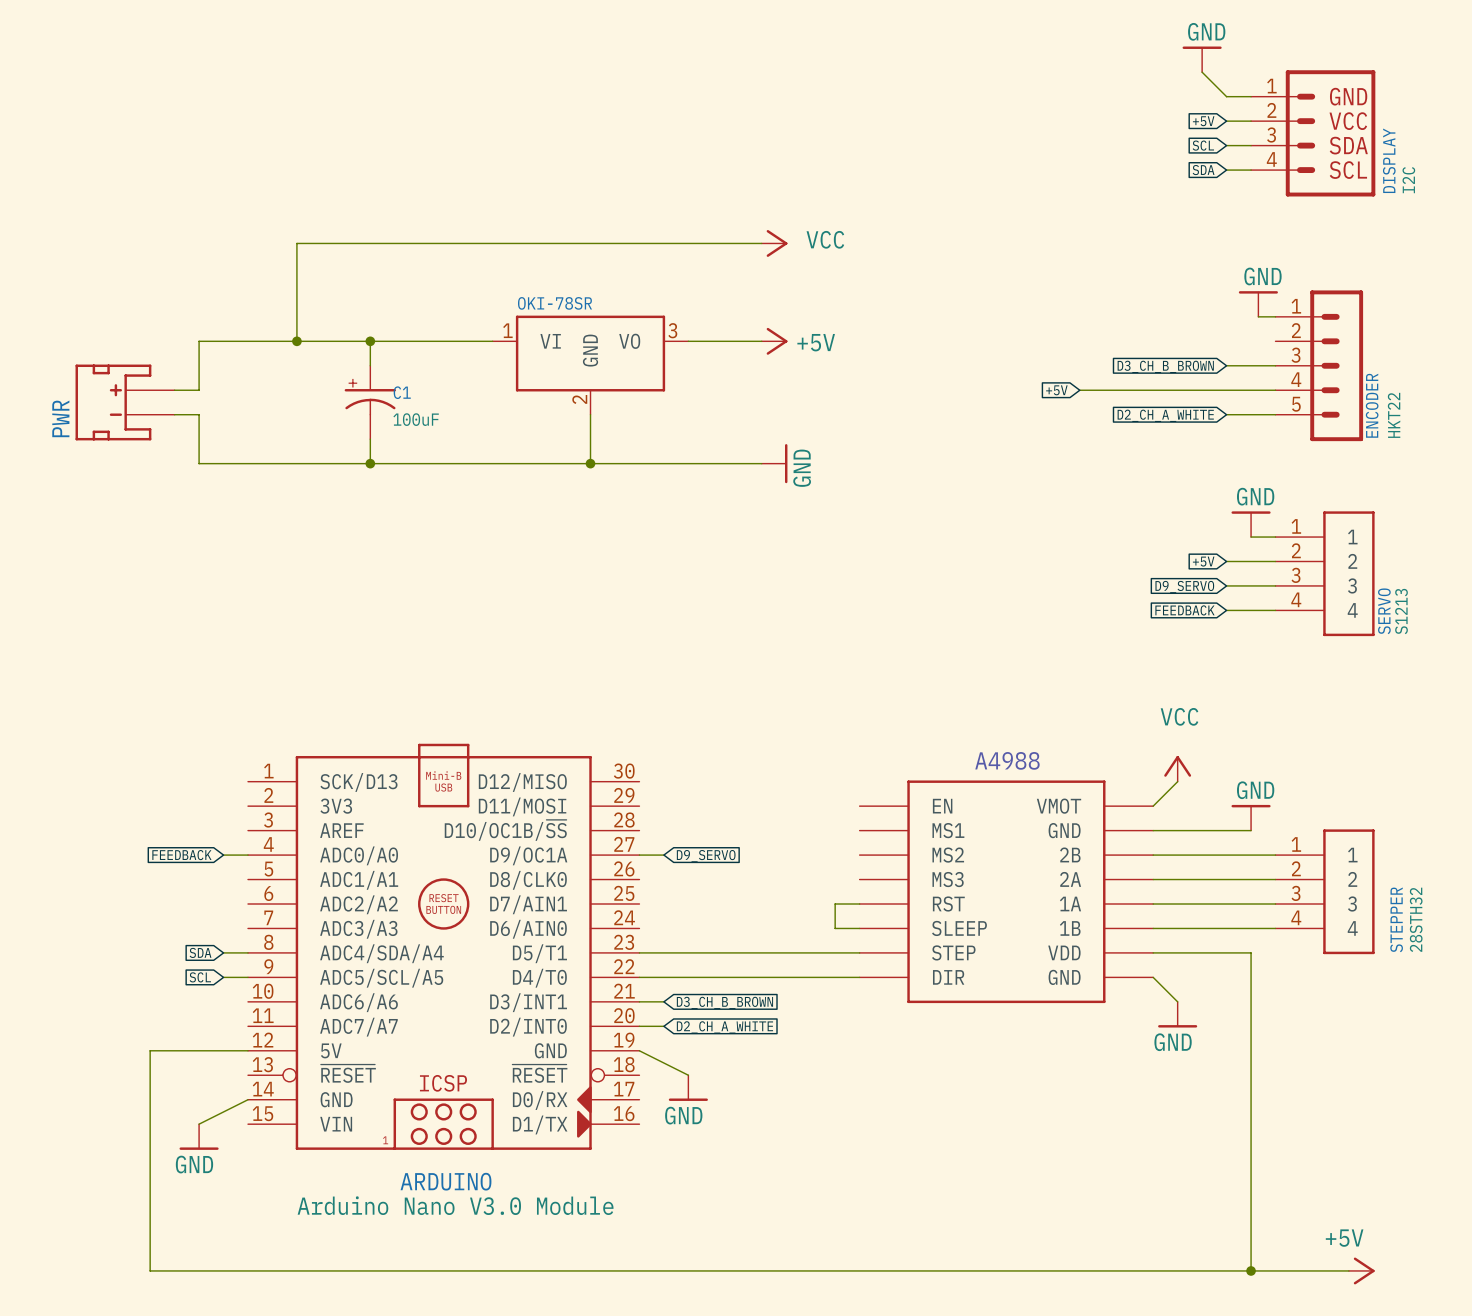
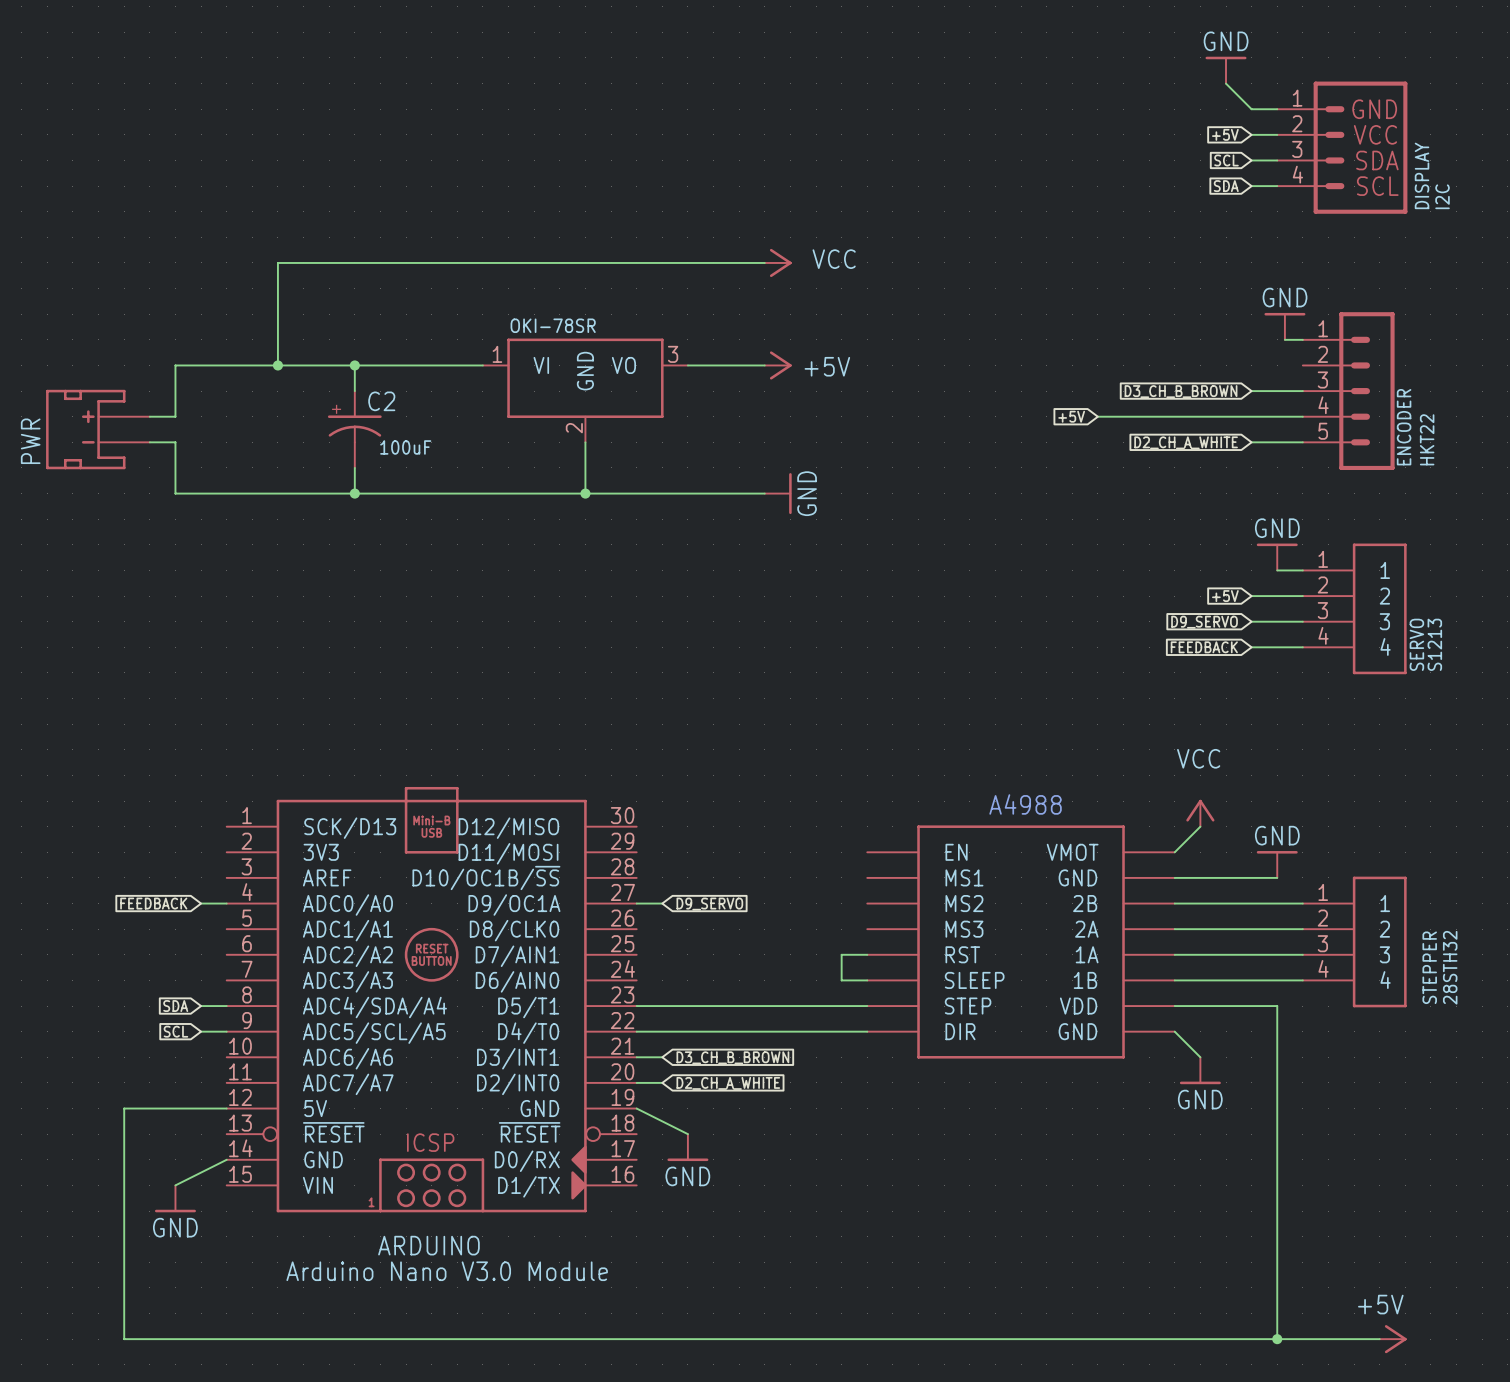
C1 name: C1 (402, 392) -> C2 (381, 401)

